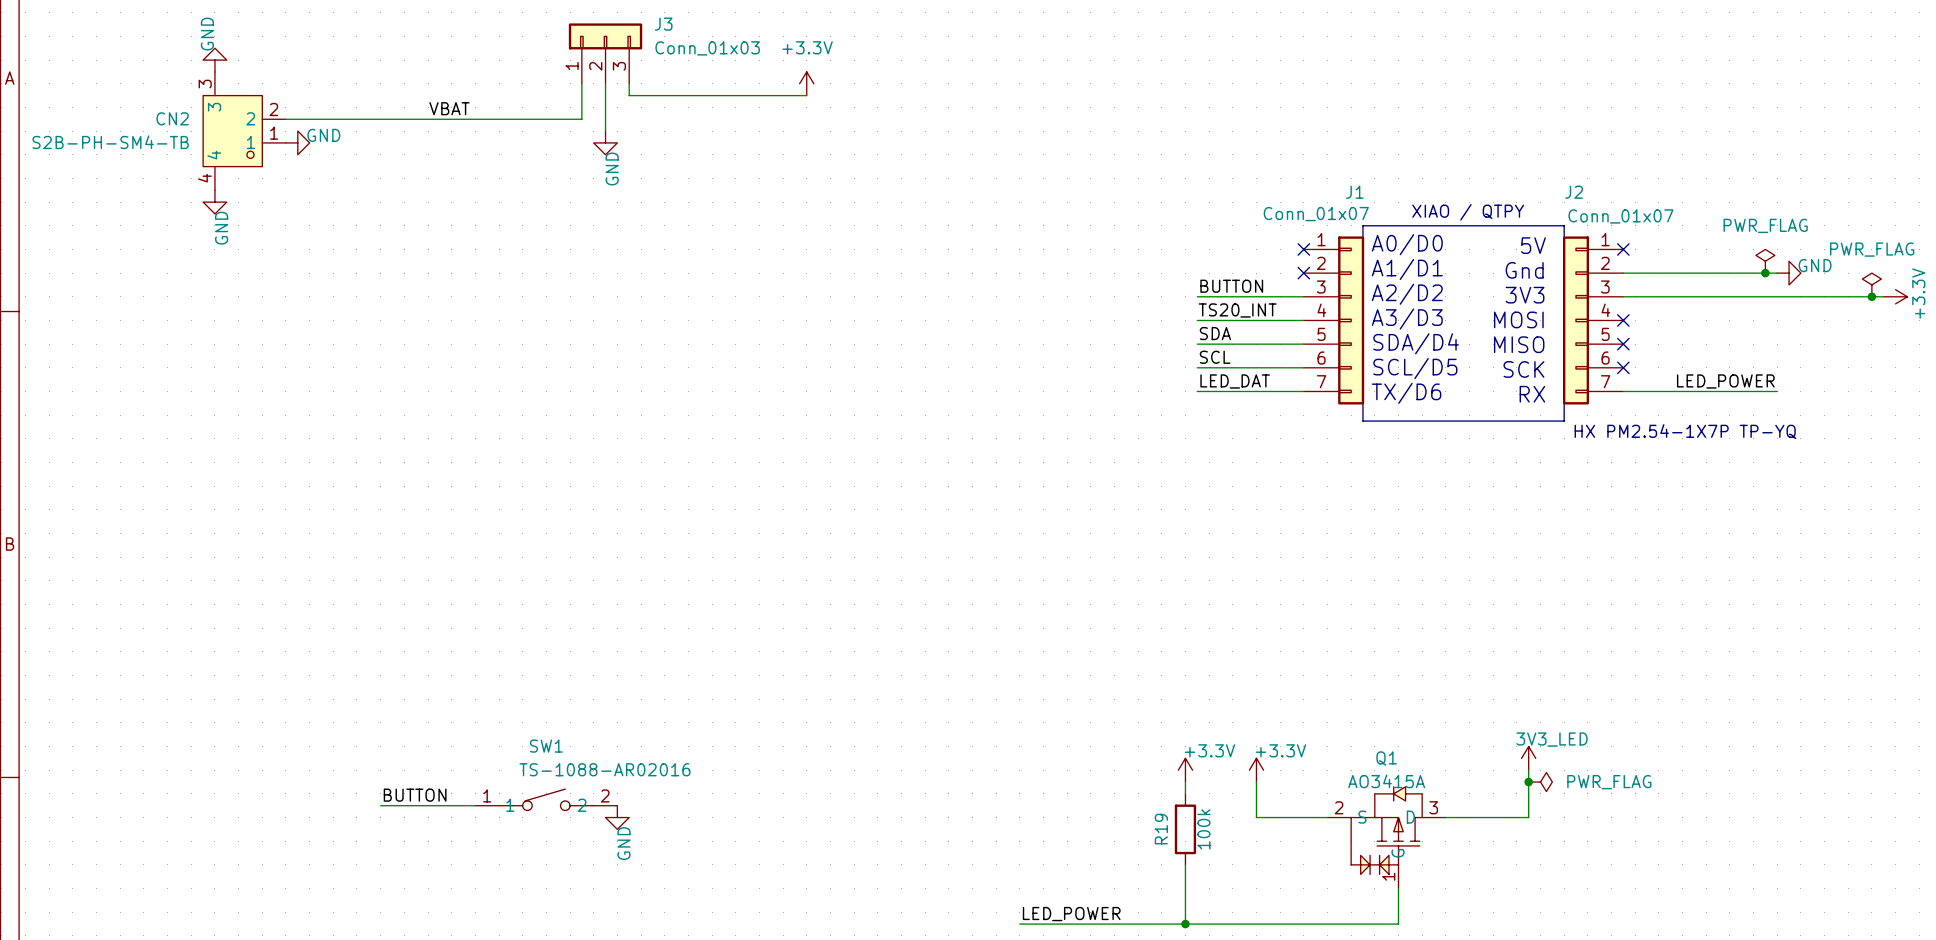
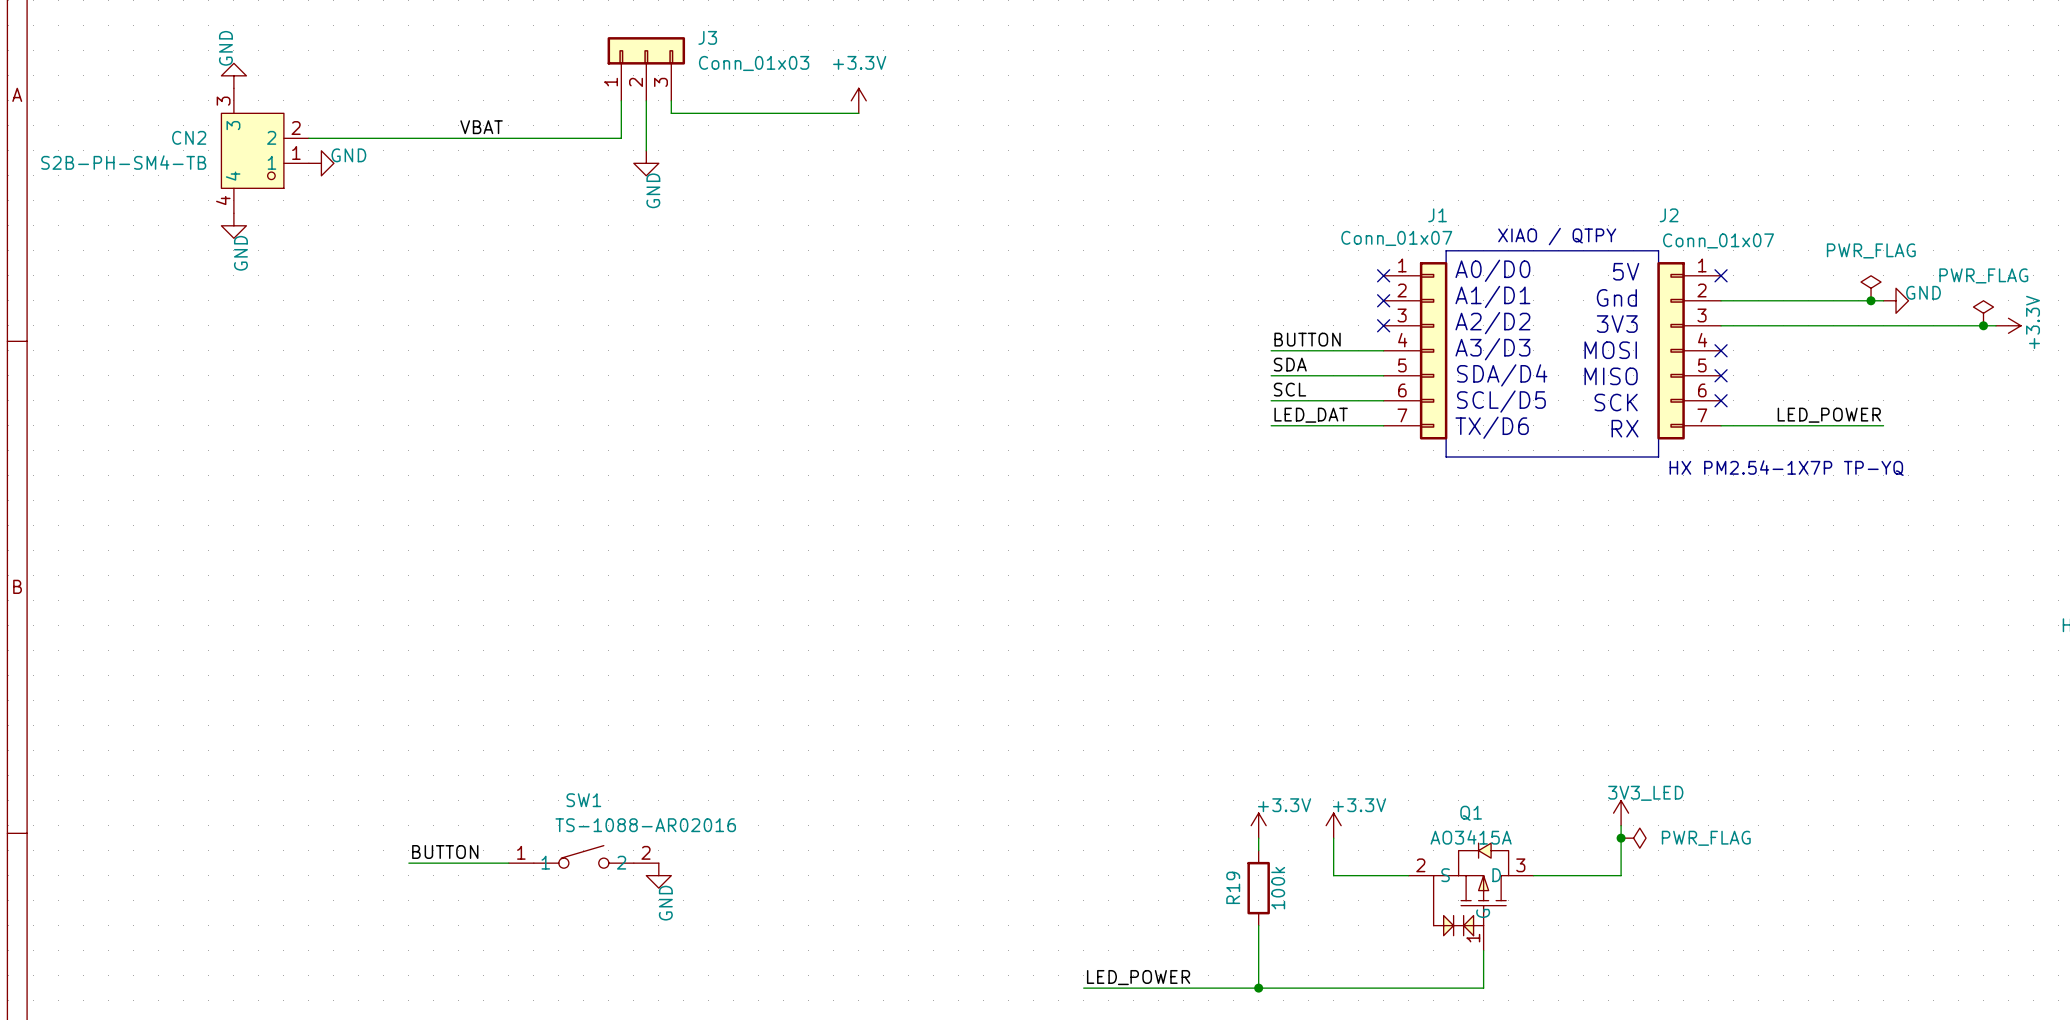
label: BUTTON (1231, 286) -> none
wire: (1197, 296) (1303, 296) -> none
no-connect mark: none -> (1383, 325)
label: TS20_INT (1237, 310) -> BUTTON (1307, 339)

